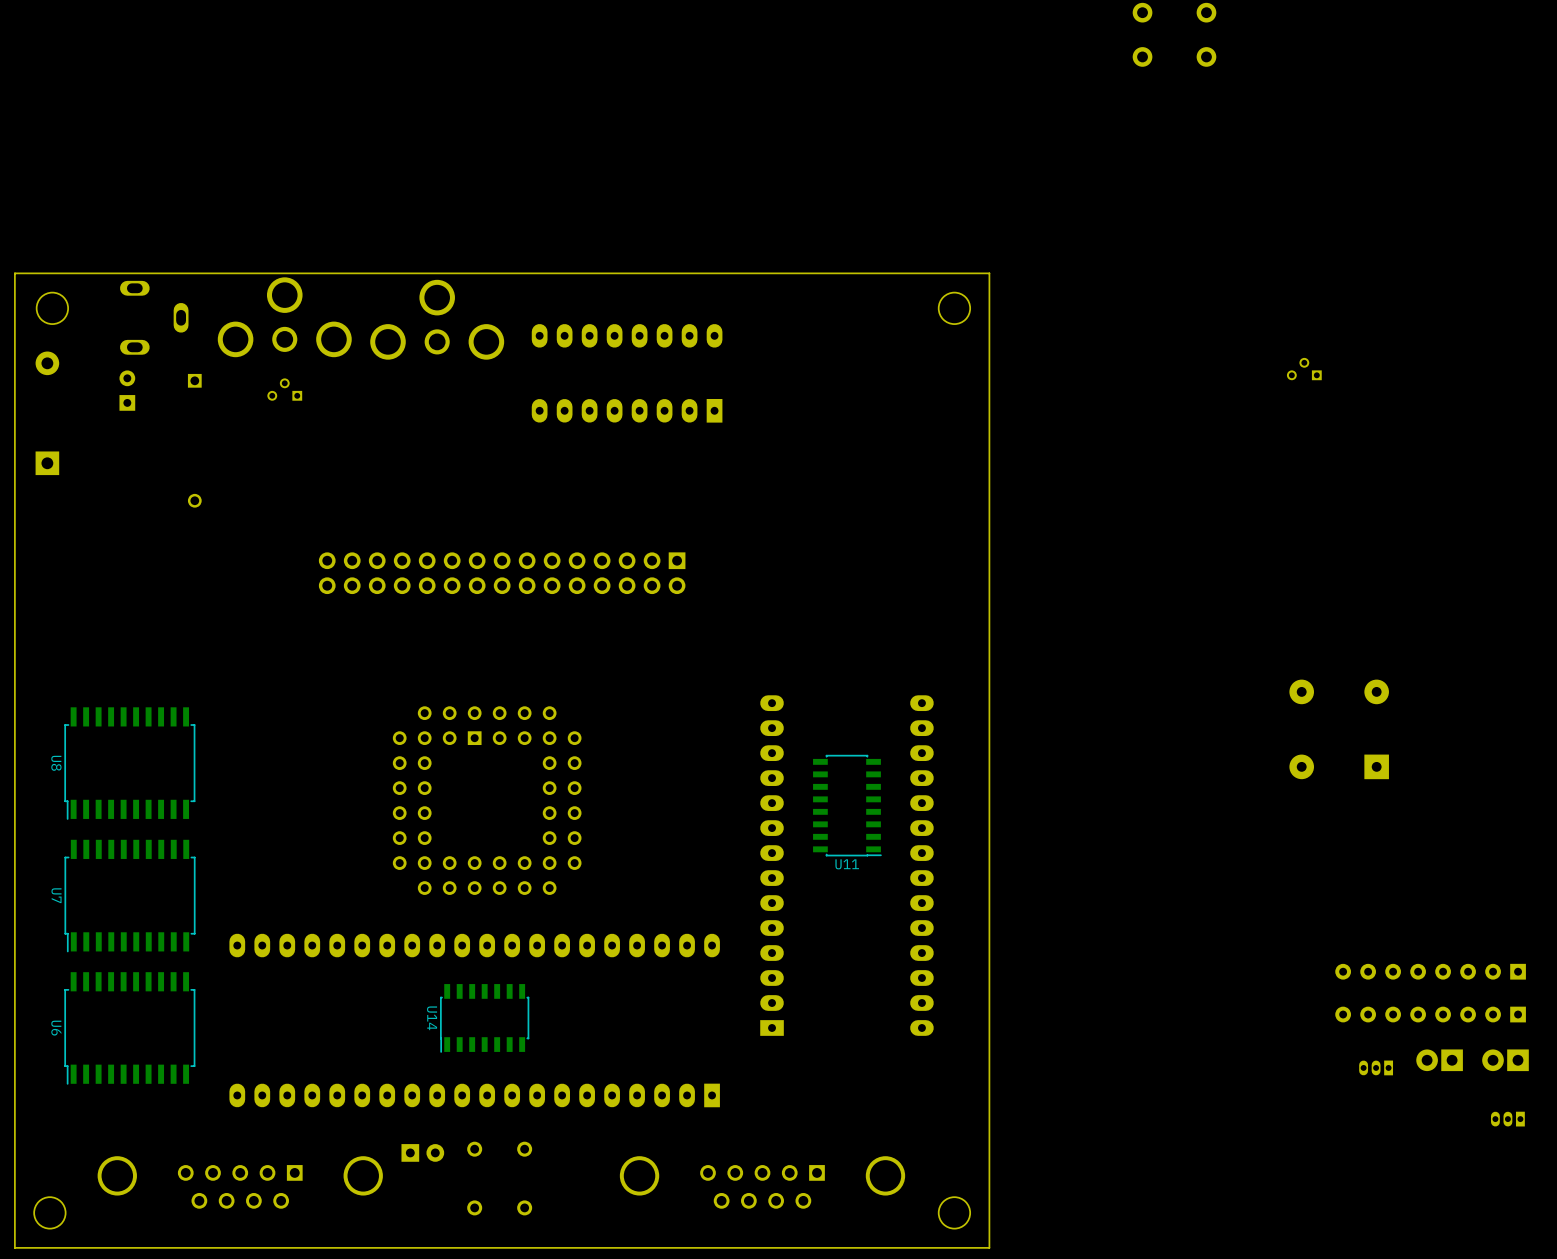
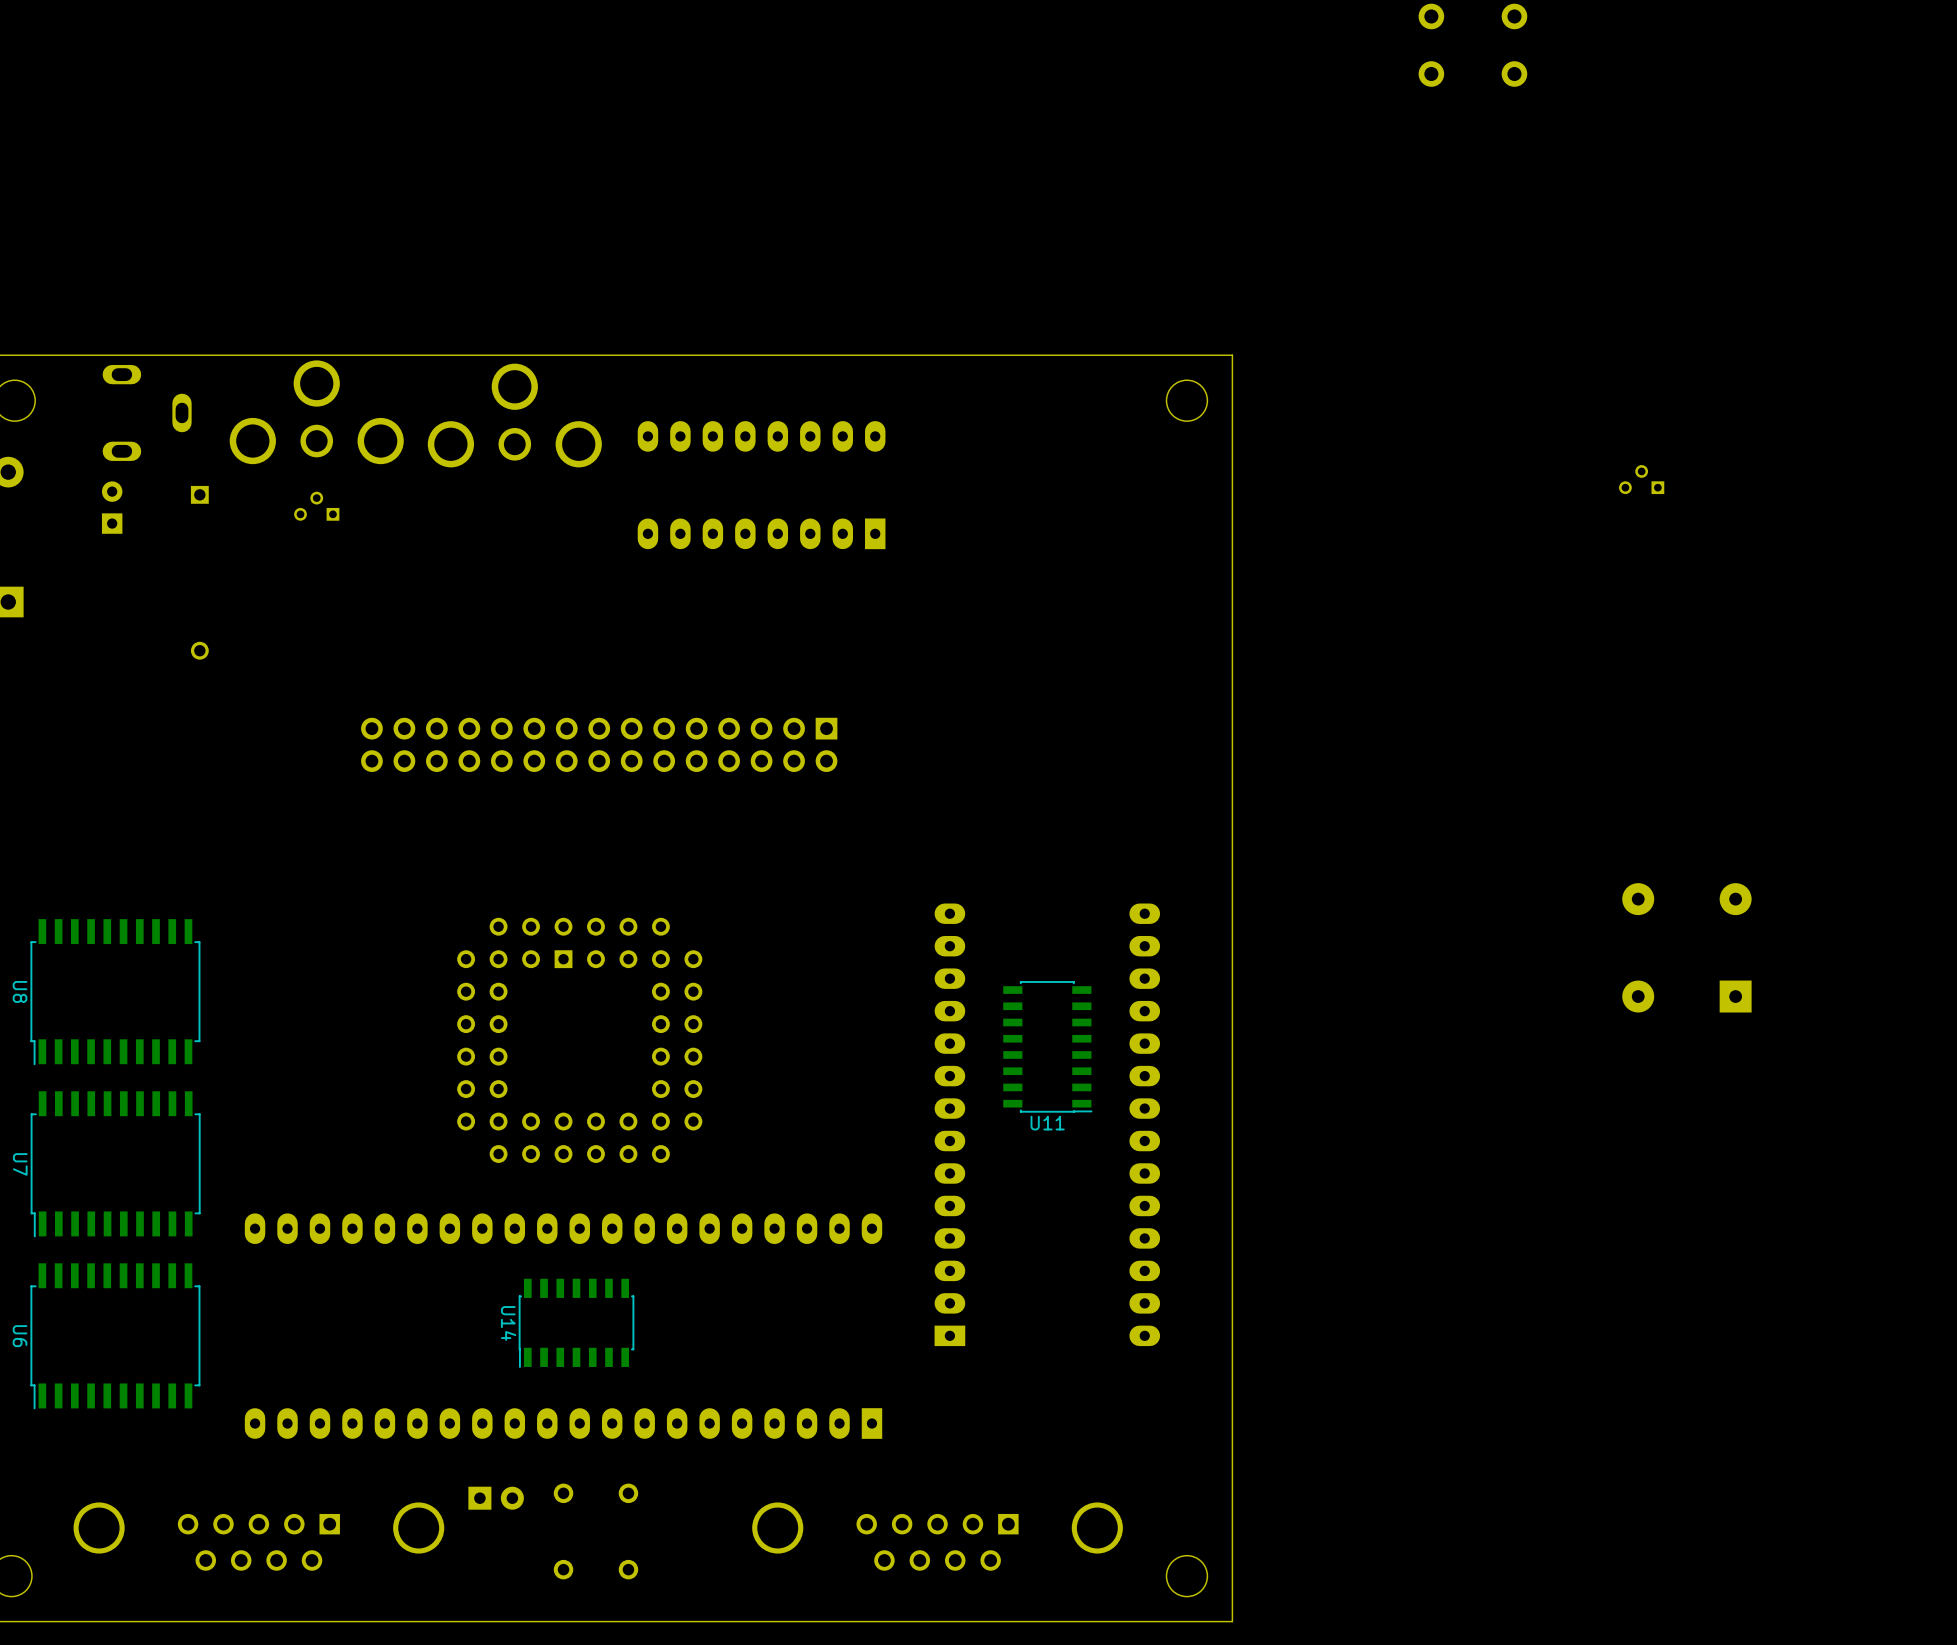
part: (1430, 971) -> none
part: (1430, 1014) -> none
part: (1439, 1060) -> none
part: (1505, 1060) -> none
part: (1376, 1067) -> none
part: (1507, 1119) -> none

